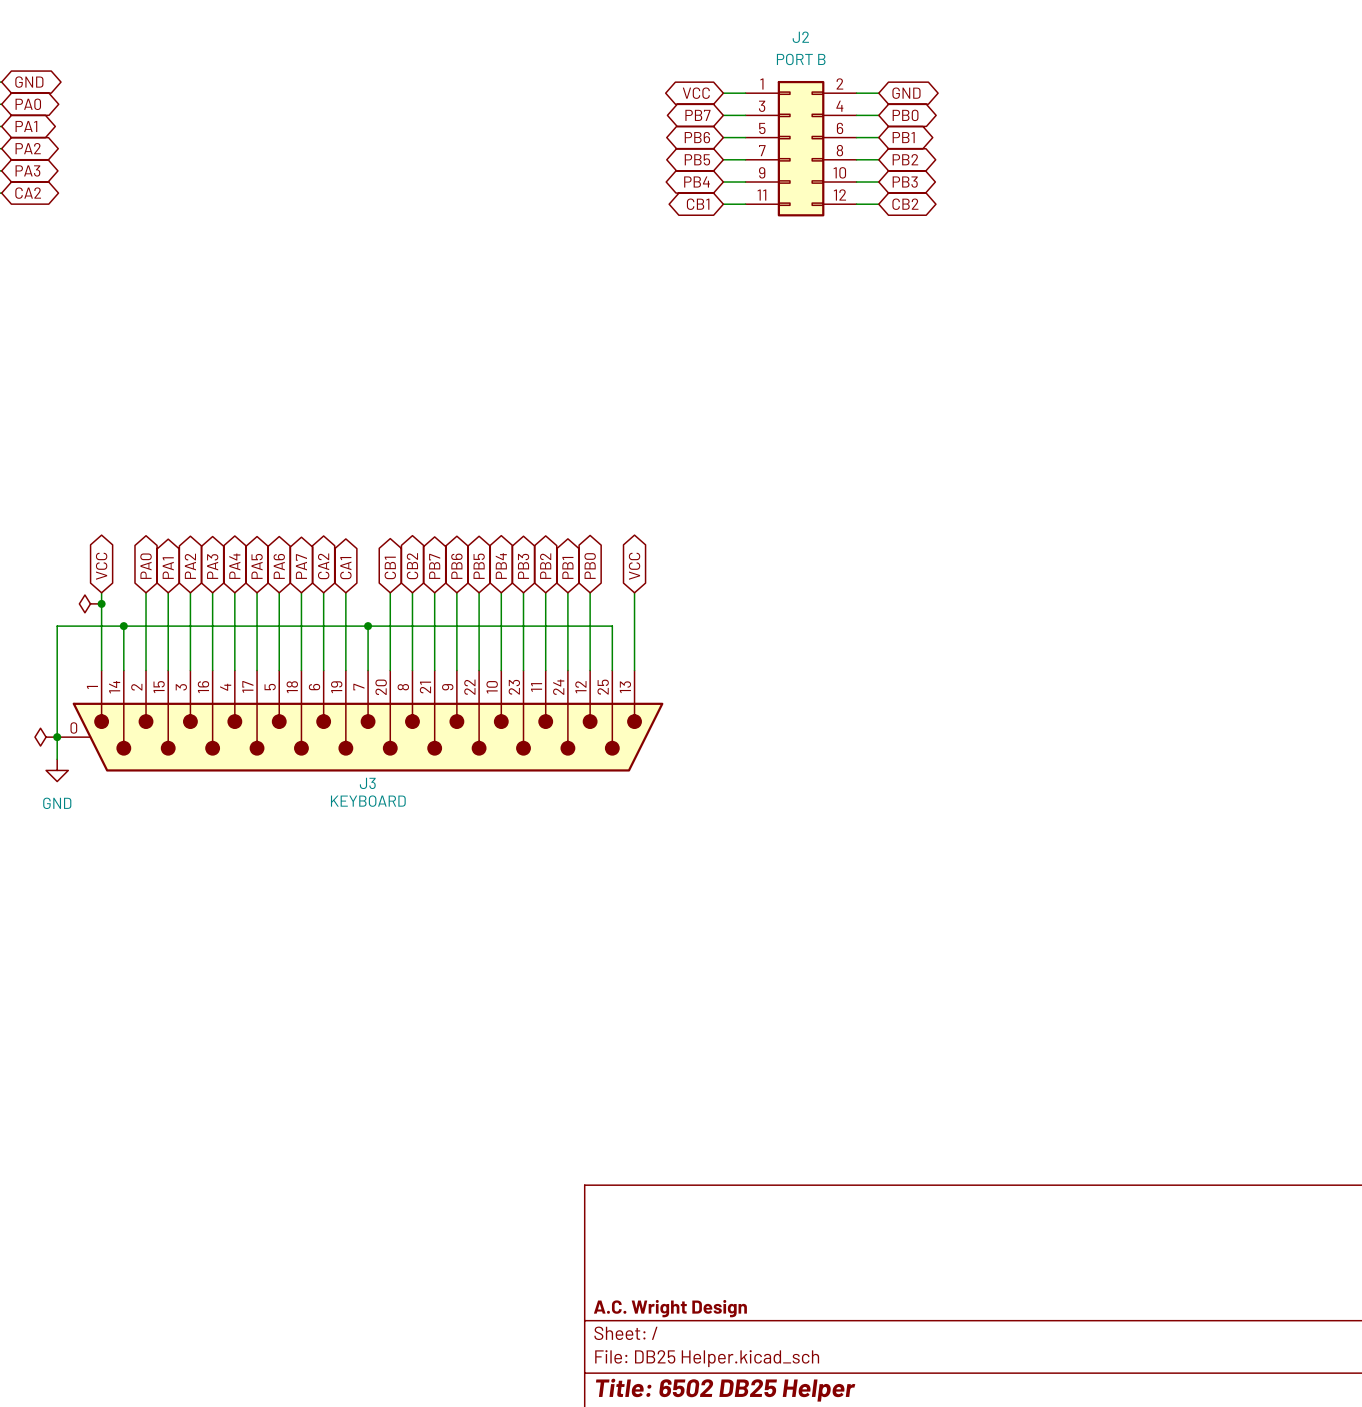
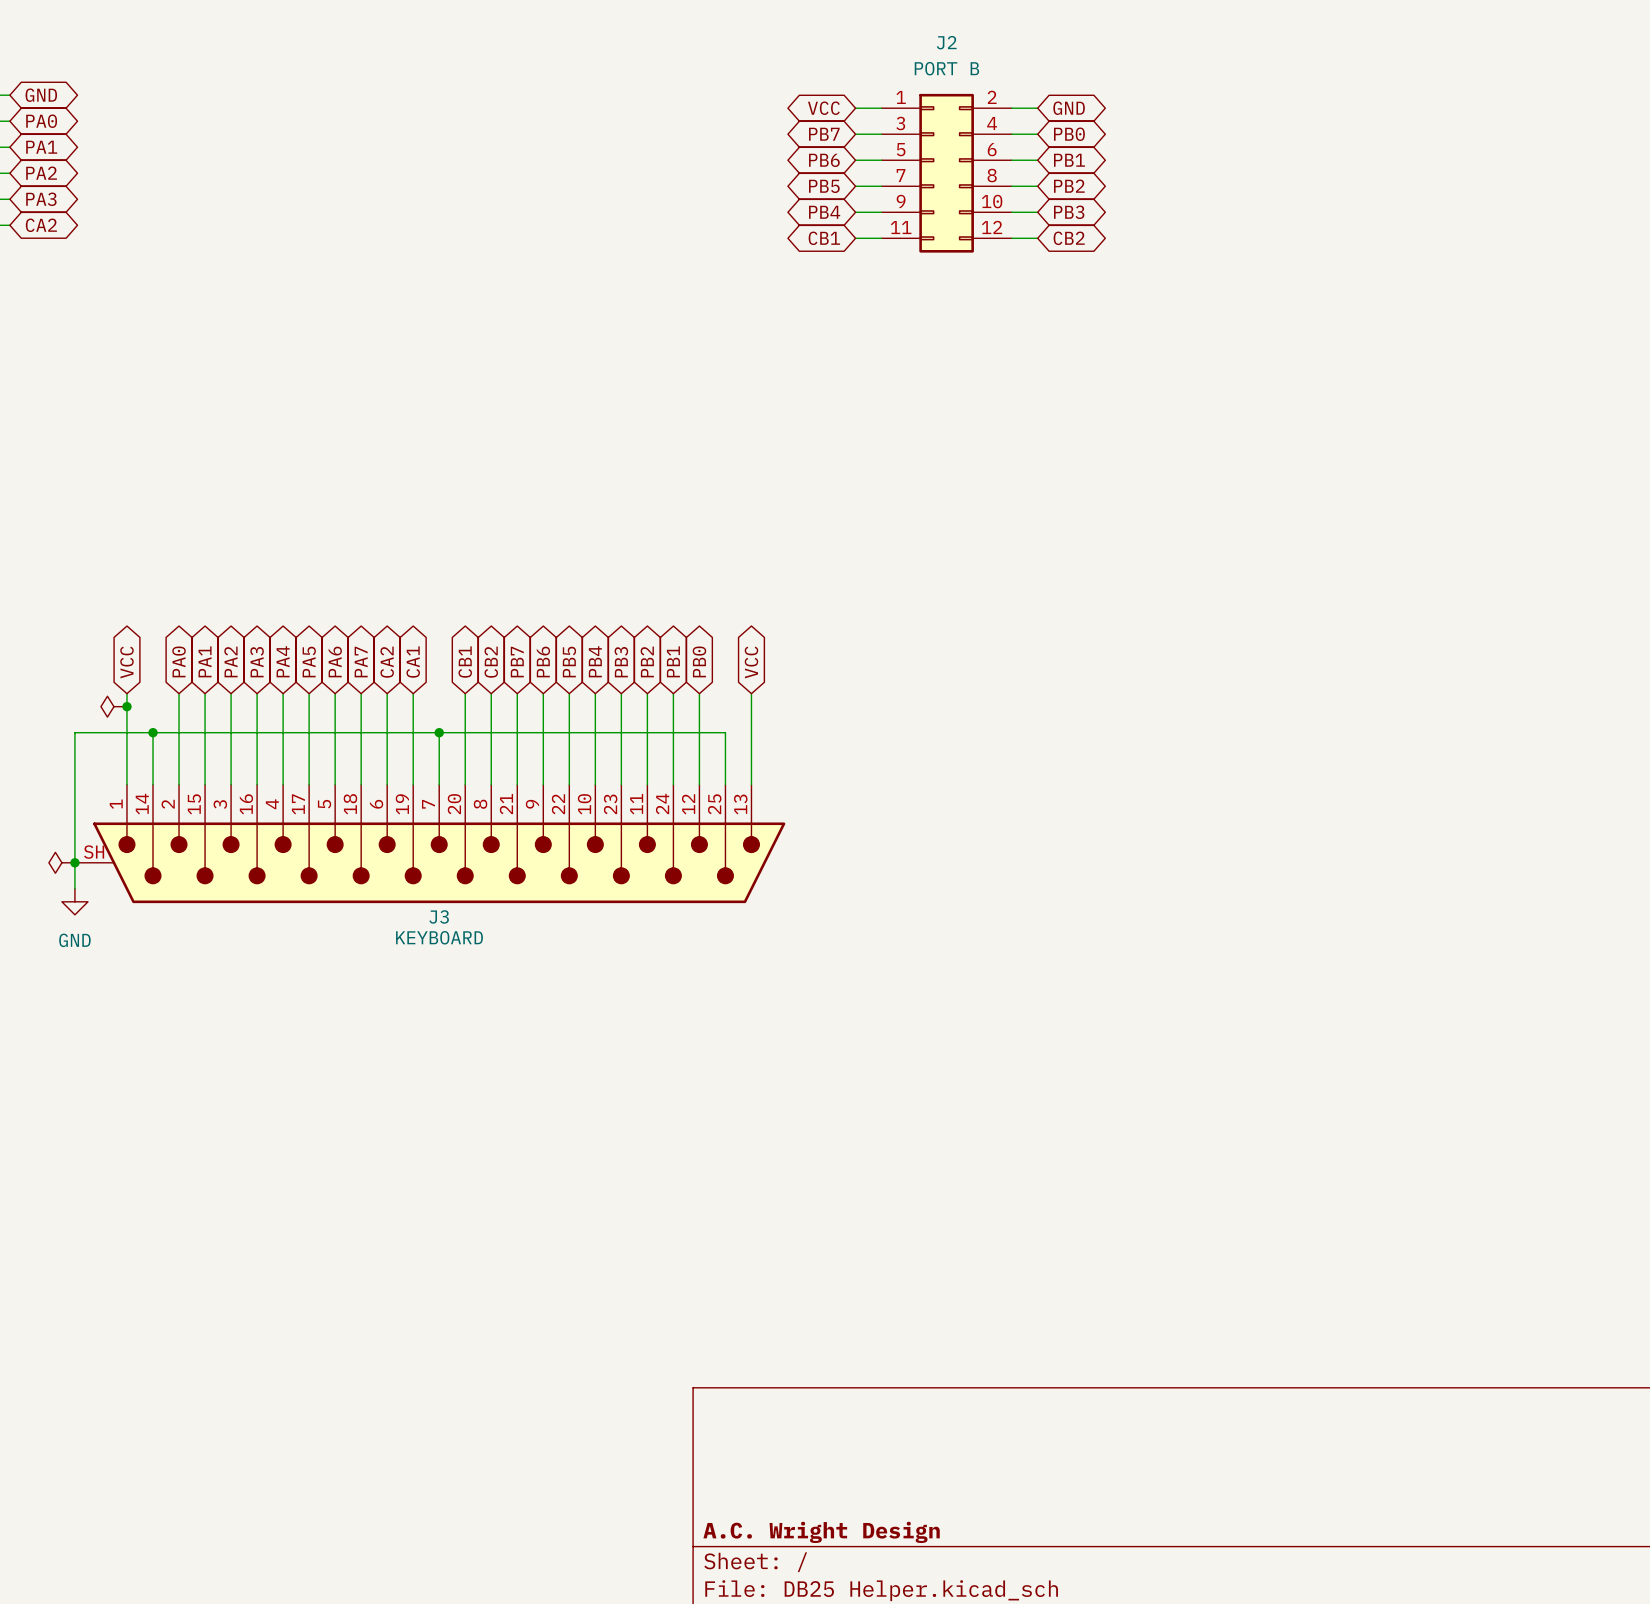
J3 pin number: 0 (73, 727) -> SH (94, 852)

